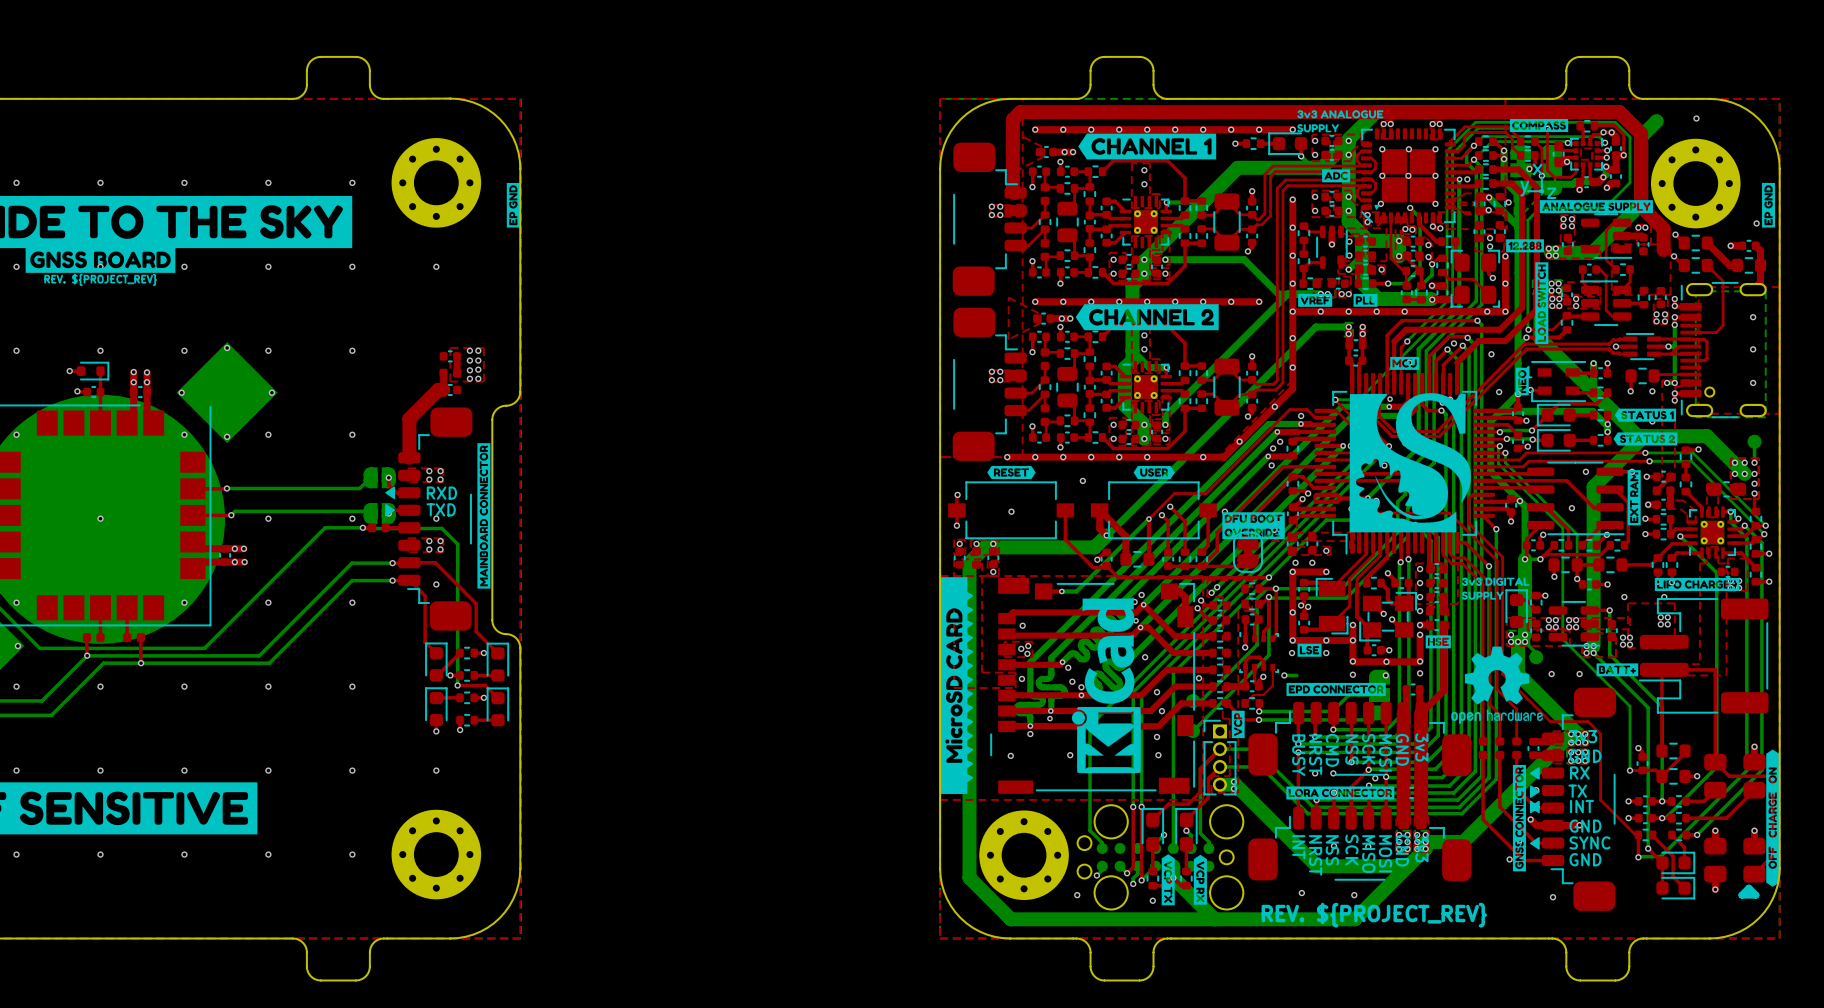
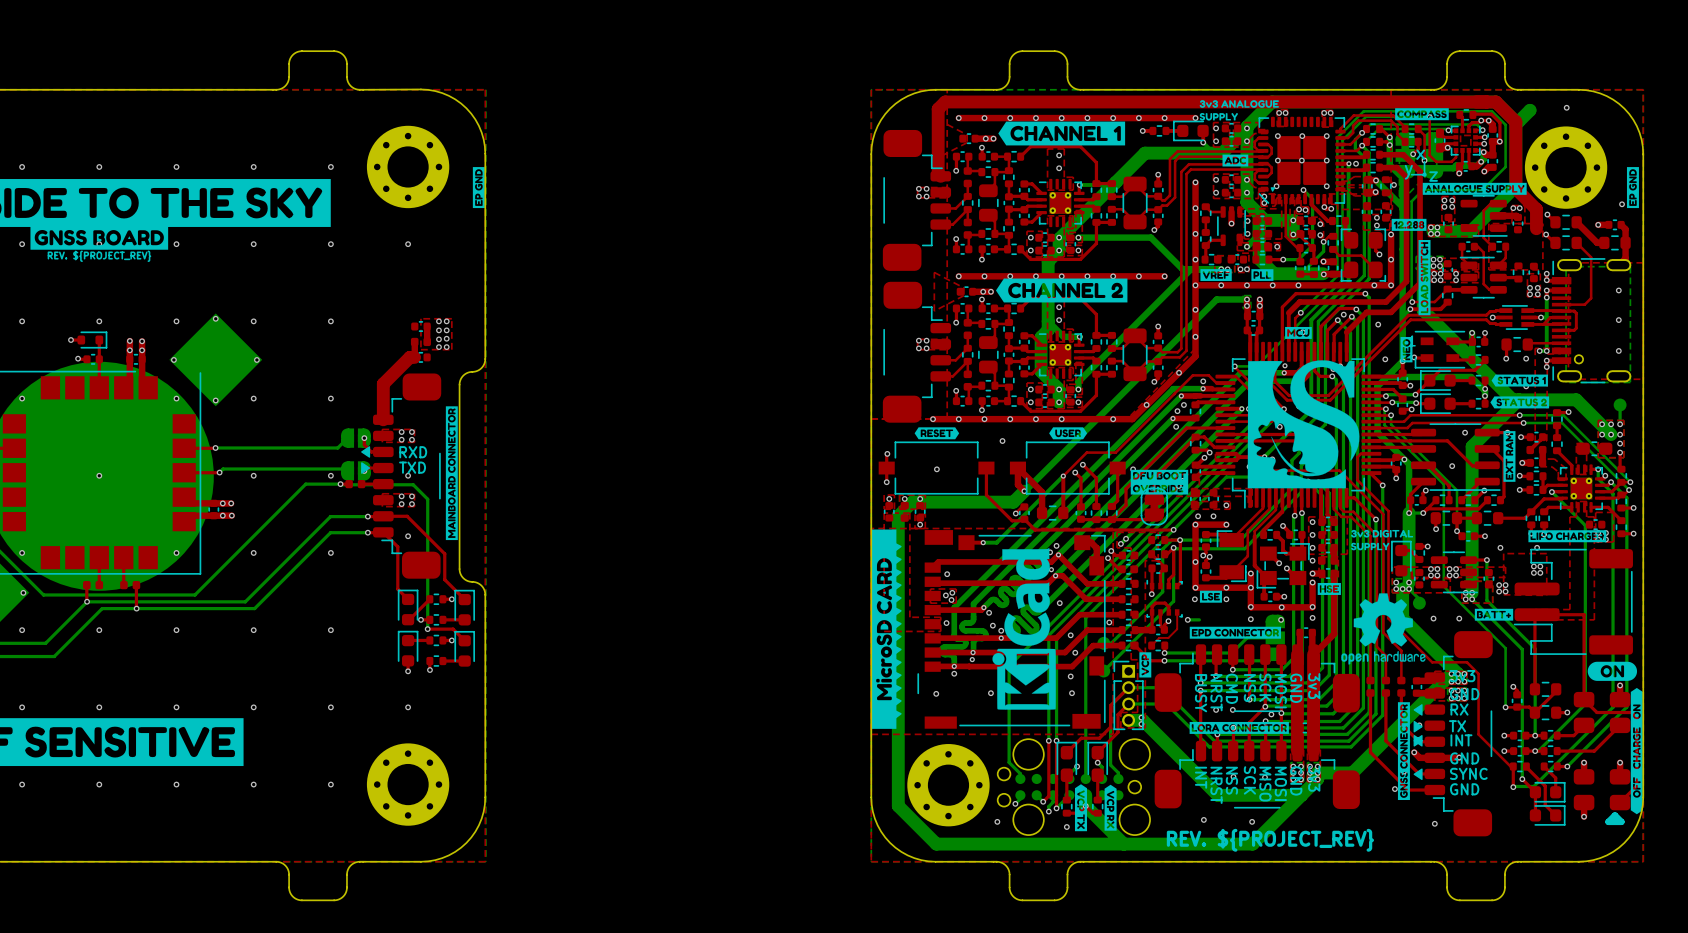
drawing: none -> [1587, 661, 1638, 681]

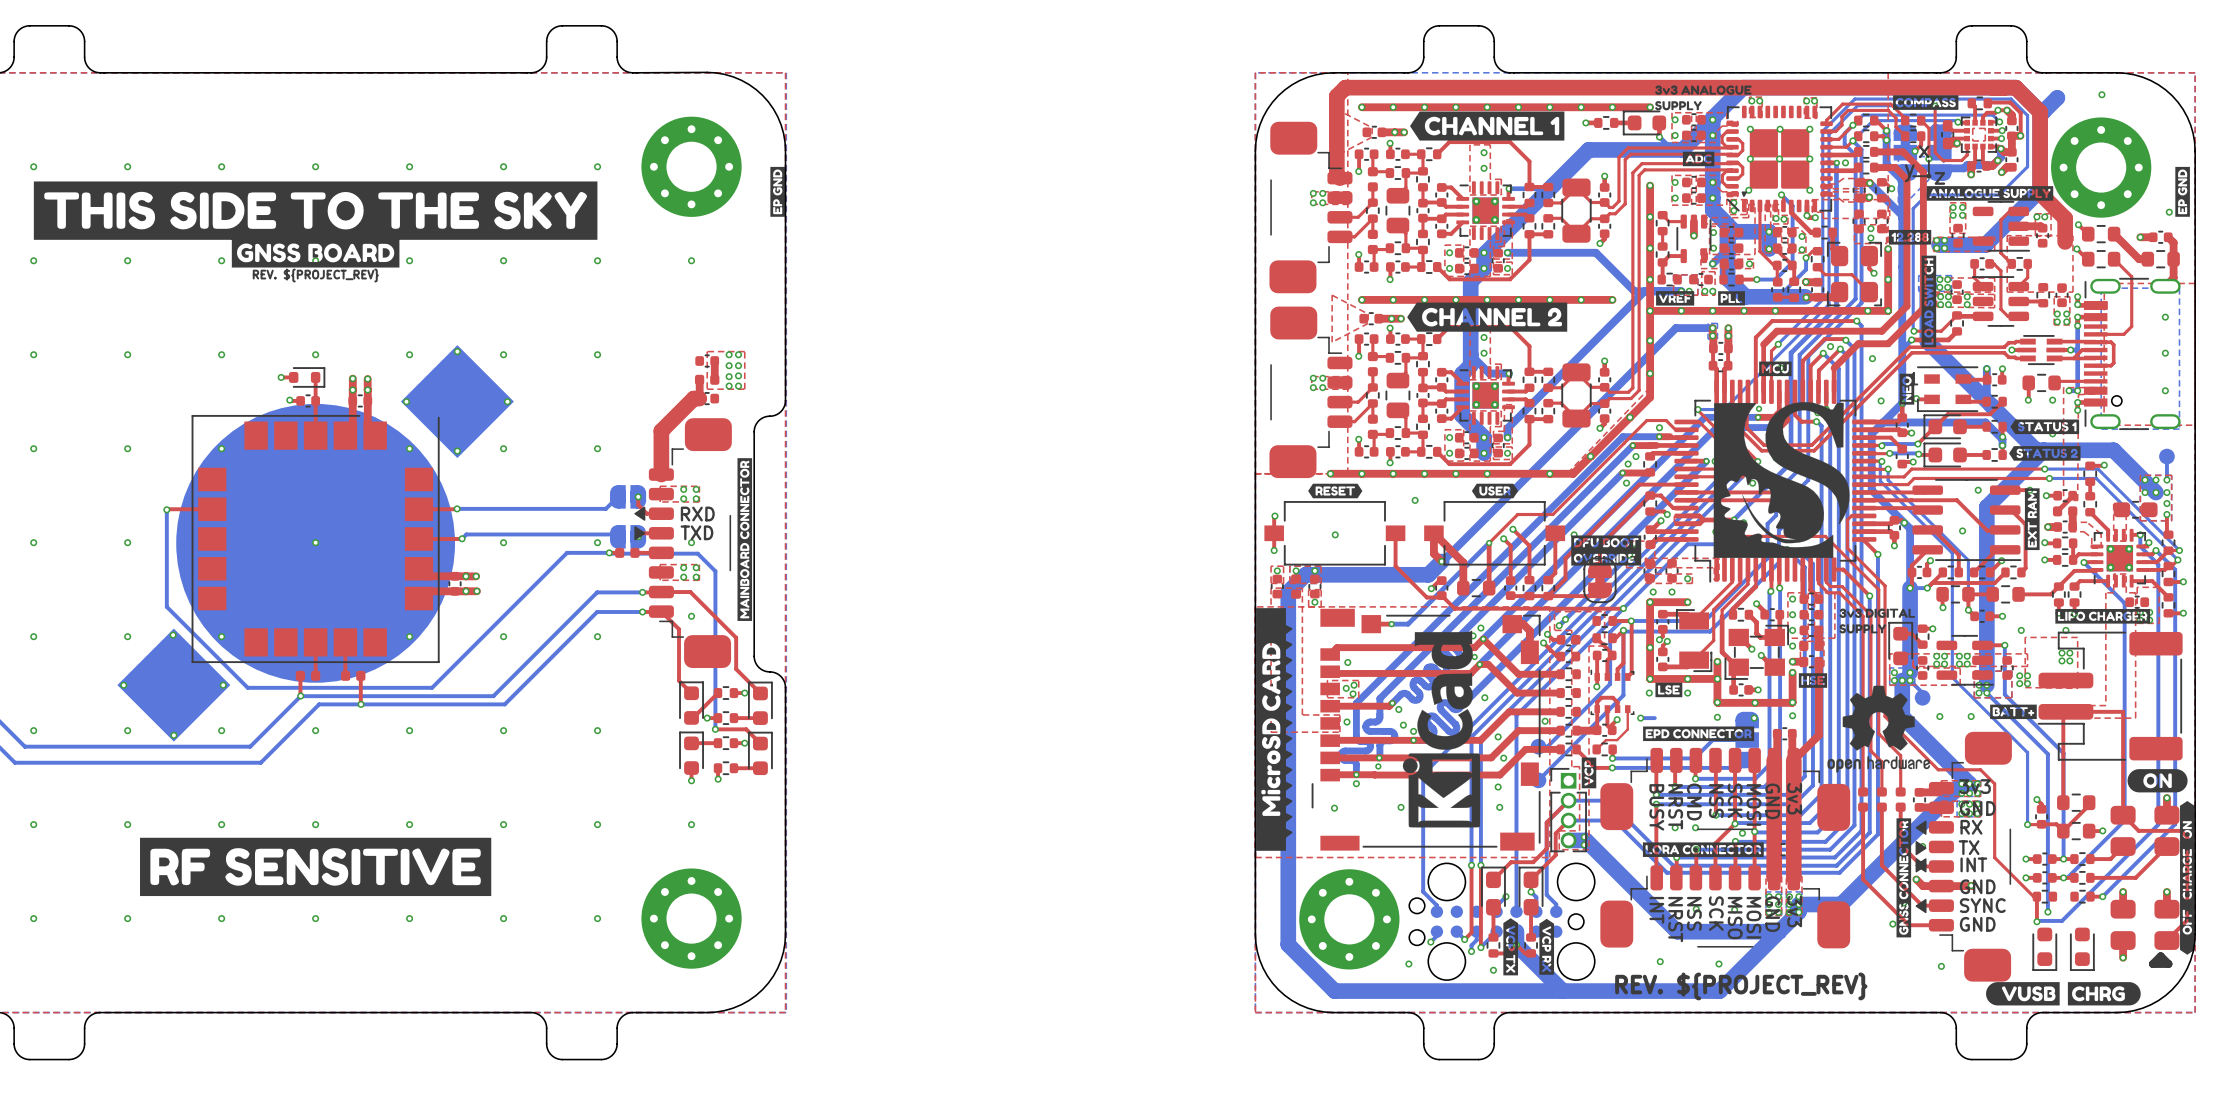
top track: (1526, 766) (1545, 786) (1545, 804) (1555, 815) -> none
top track: (1544, 766) (1555, 778) (1555, 792) -> none
top track: (1522, 779) (1535, 792) (1535, 815) -> none
part rotation: 0° (1547, 792) -> 90° clockwise (2044, 949)
part position: (1547, 792) -> (2044, 949)
part rotation: 0° (1547, 815) -> 90° clockwise (2082, 949)
drawing: none -> [1986, 982, 2141, 1006]

